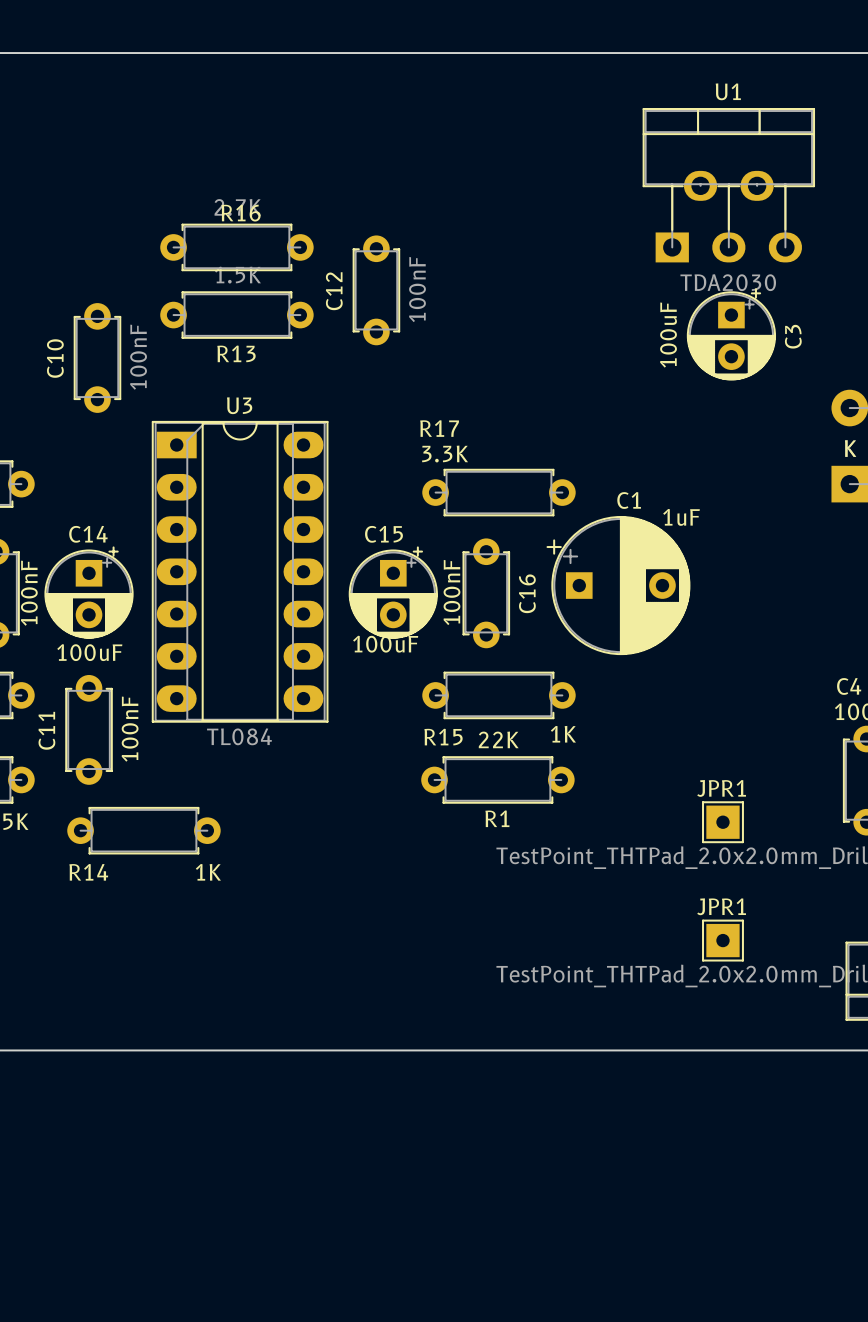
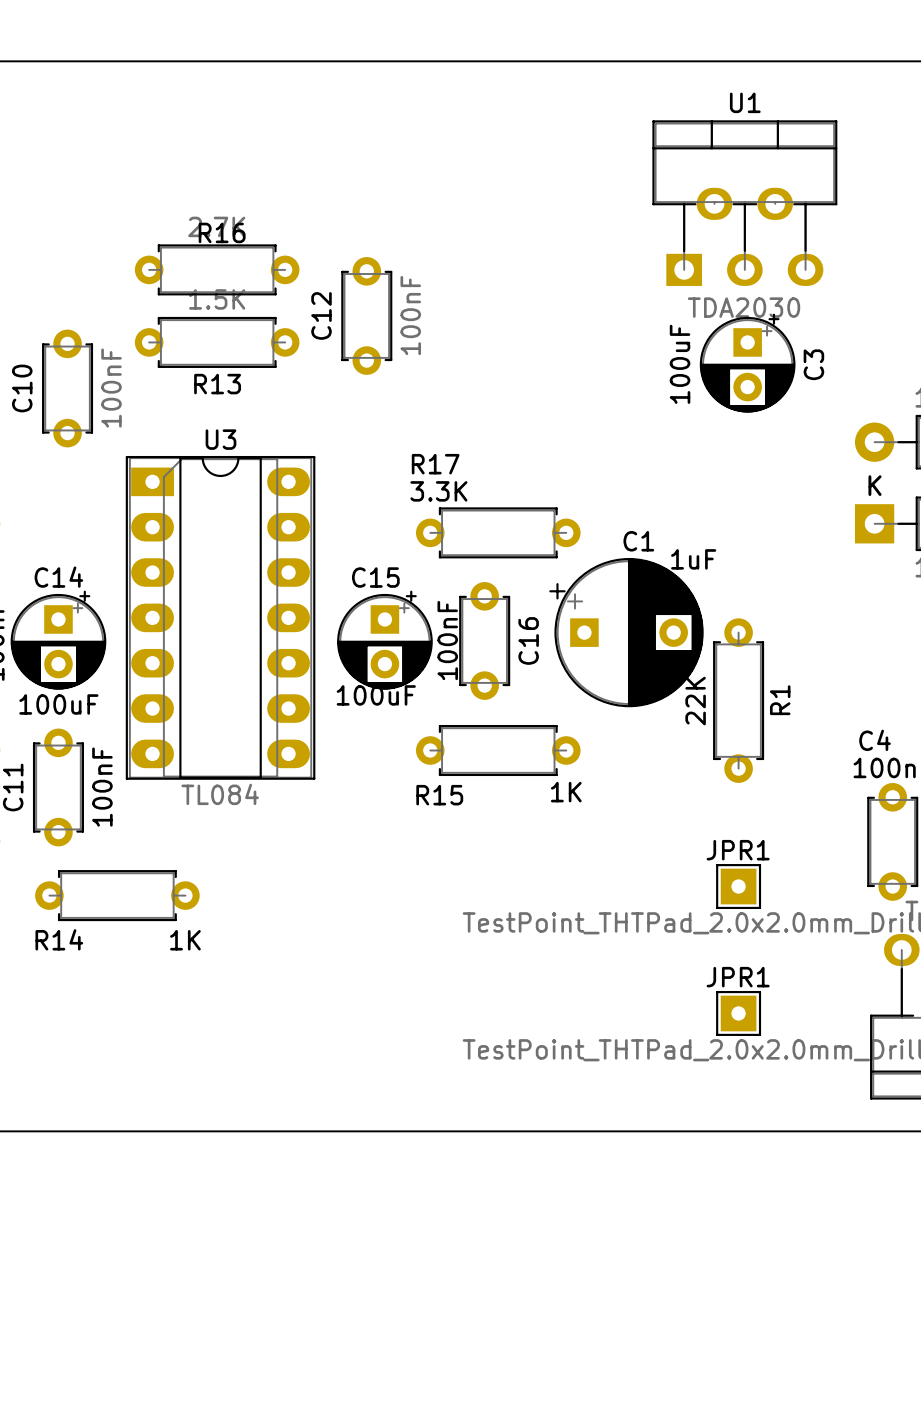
R1 value position: 22K (498, 739) -> 22K (695, 701)
R1 rotation: 0° (497, 779) -> 90° clockwise (738, 700)
R1 position: (497, 779) -> (738, 700)
R1 name position: R1 (497, 818) -> R1 (780, 700)

